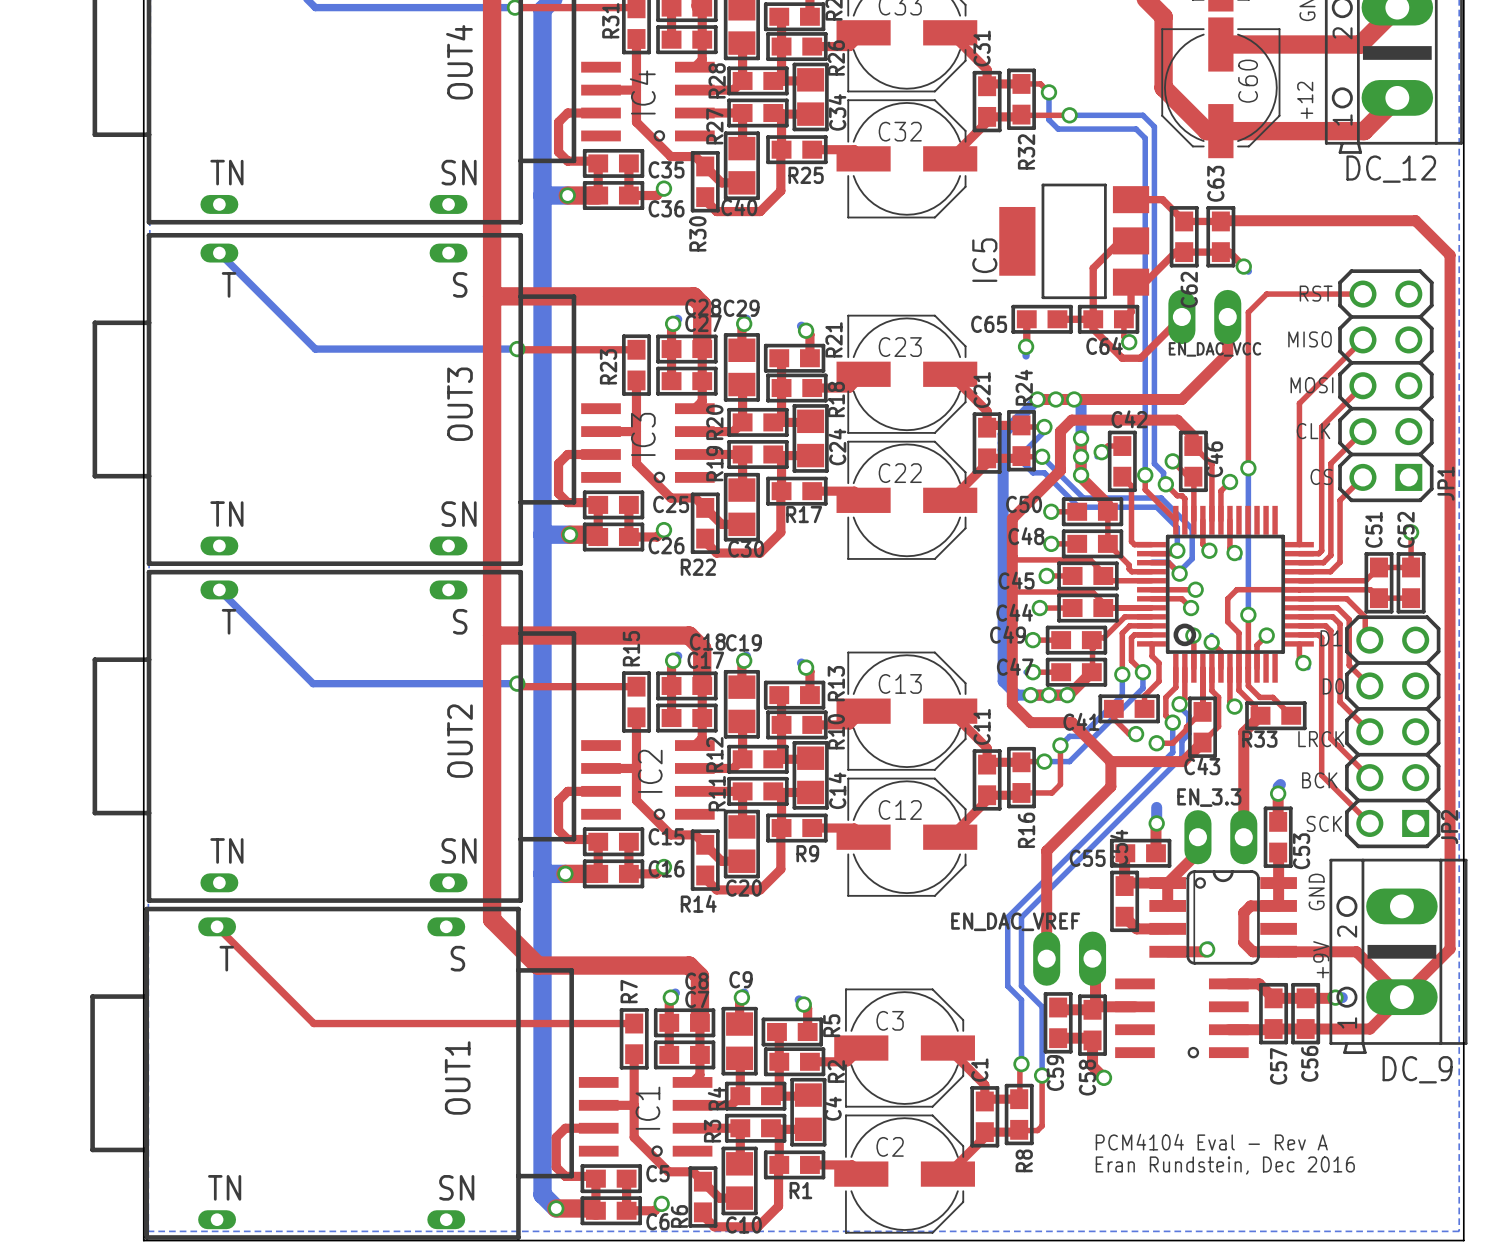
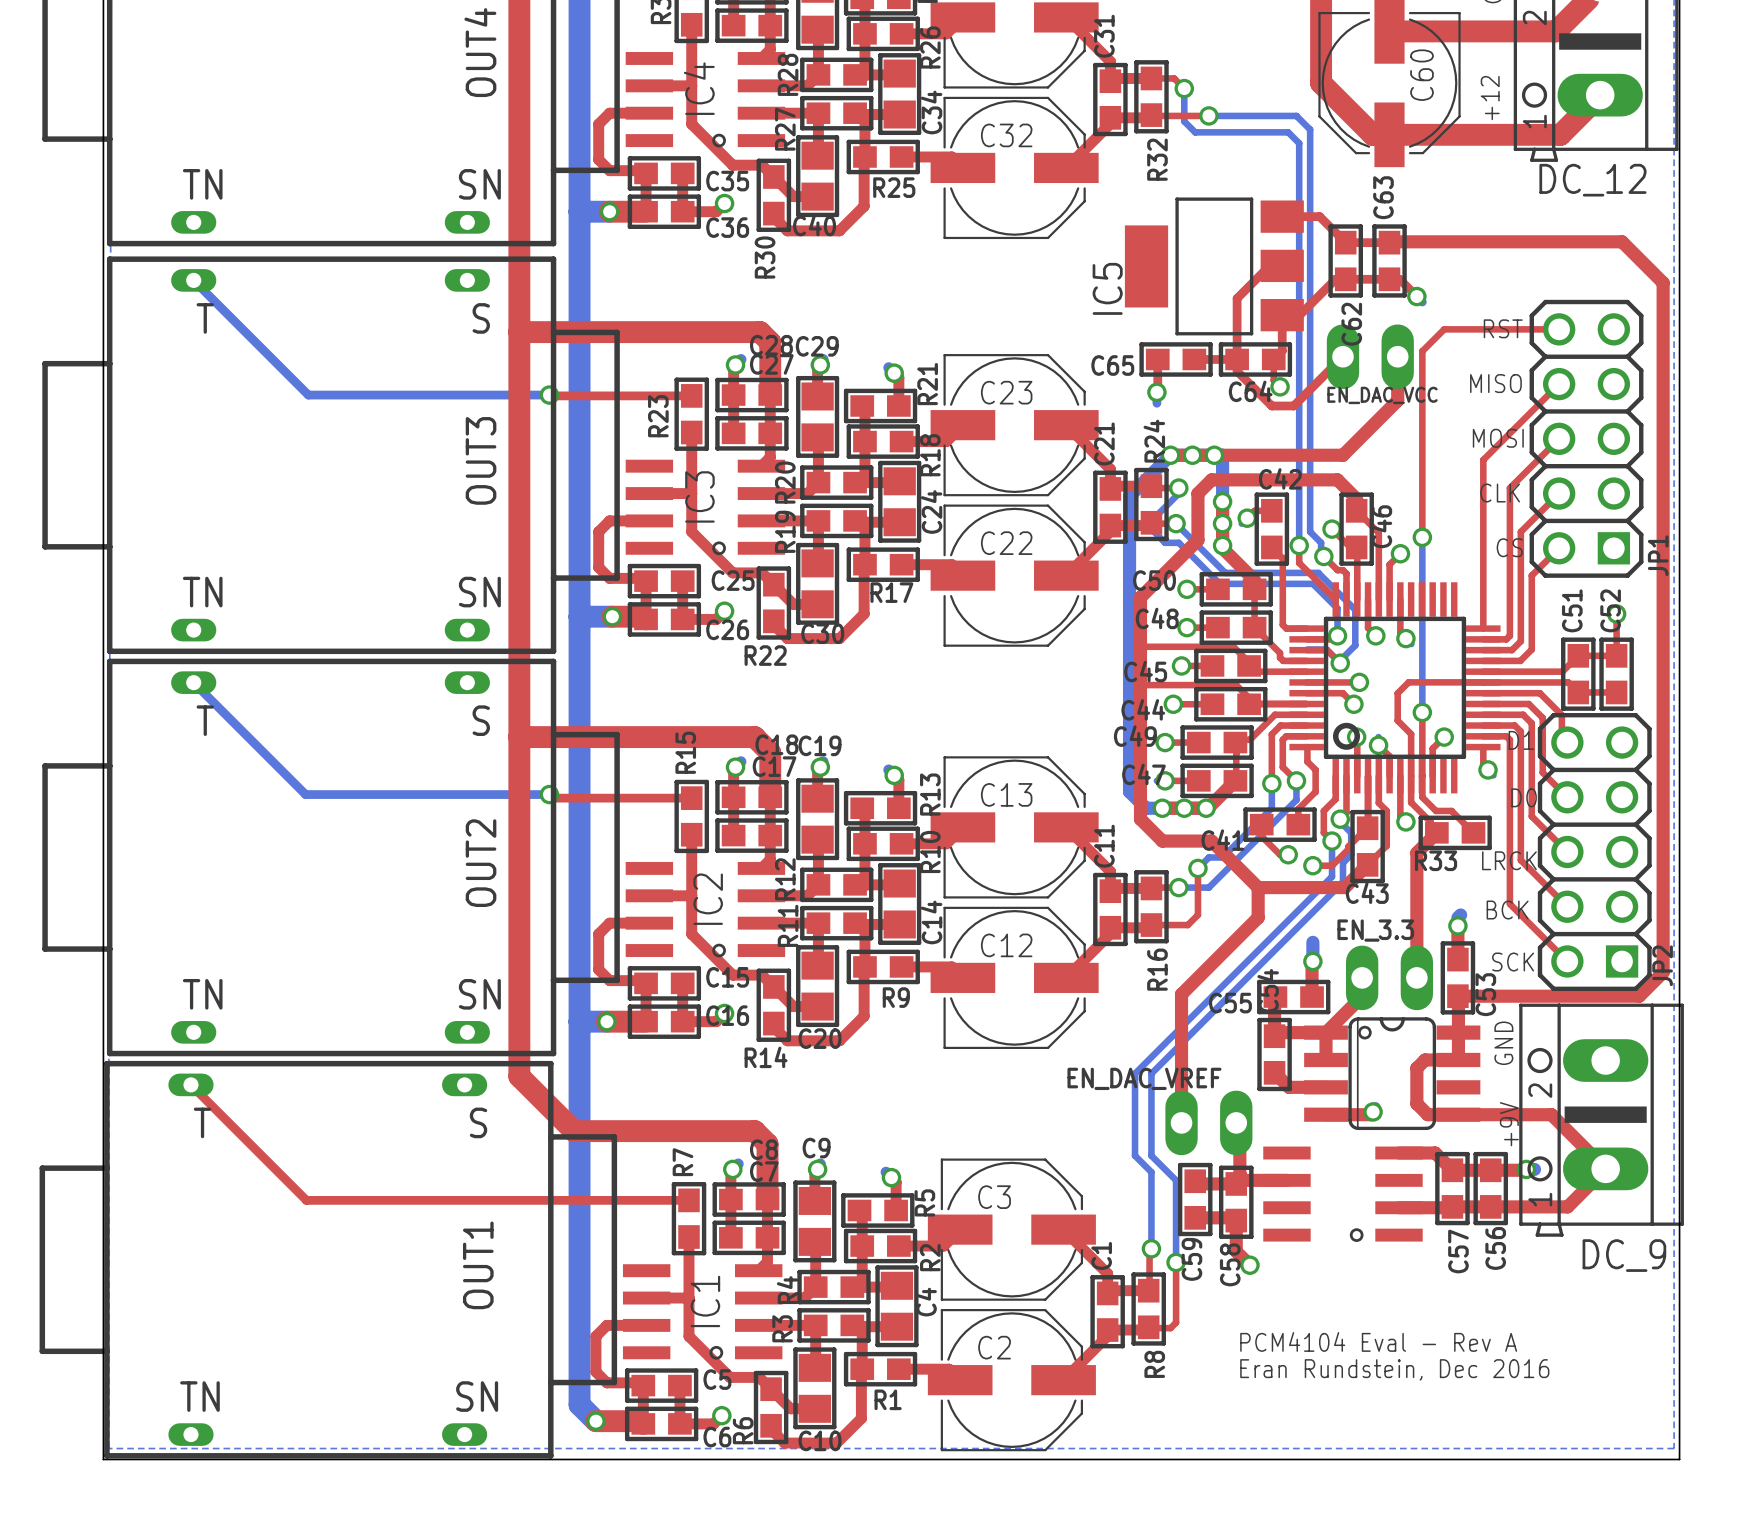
top track: (1450, 832) (1450, 949) (1401, 997) -> (1663, 972) (1639, 996) (1457, 996)

